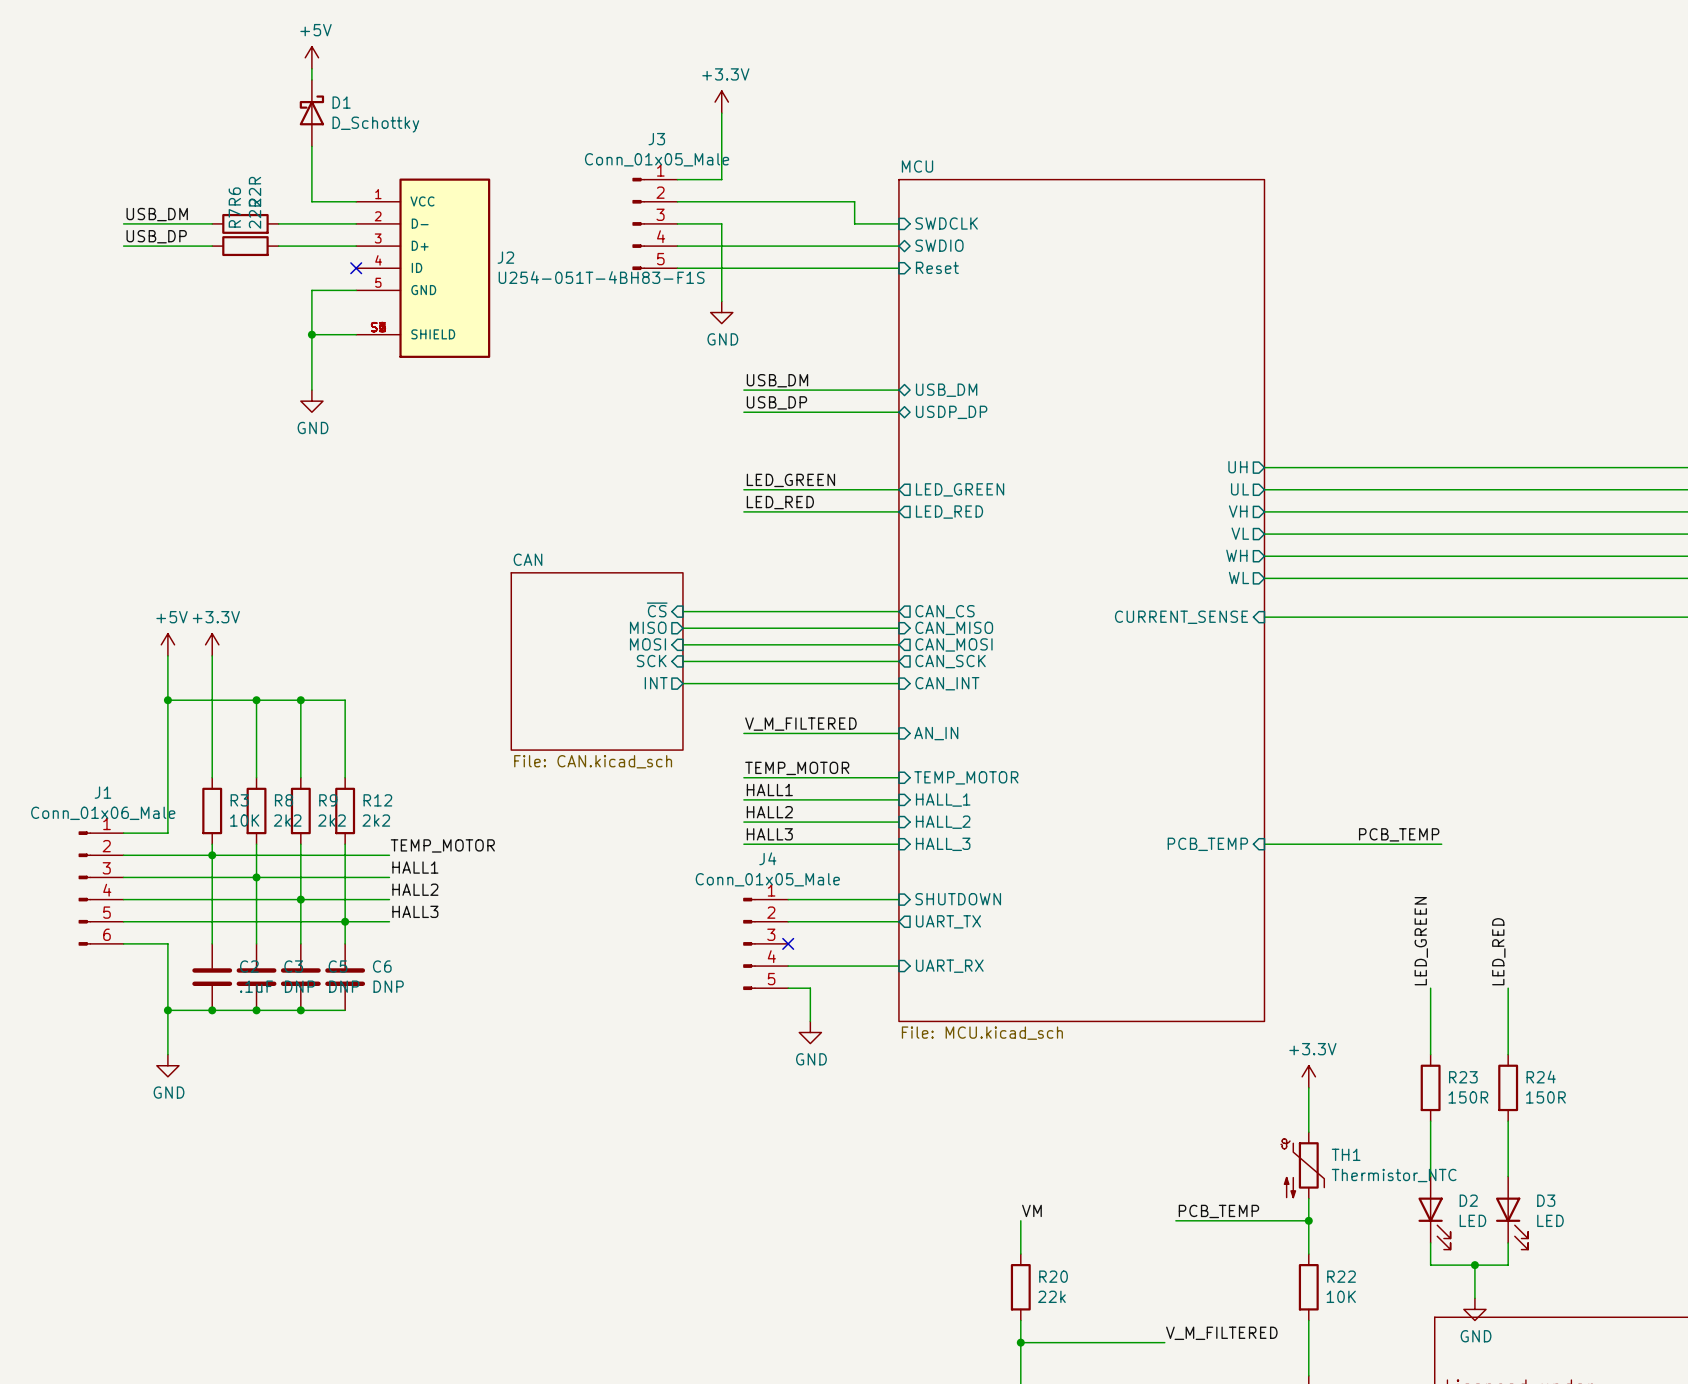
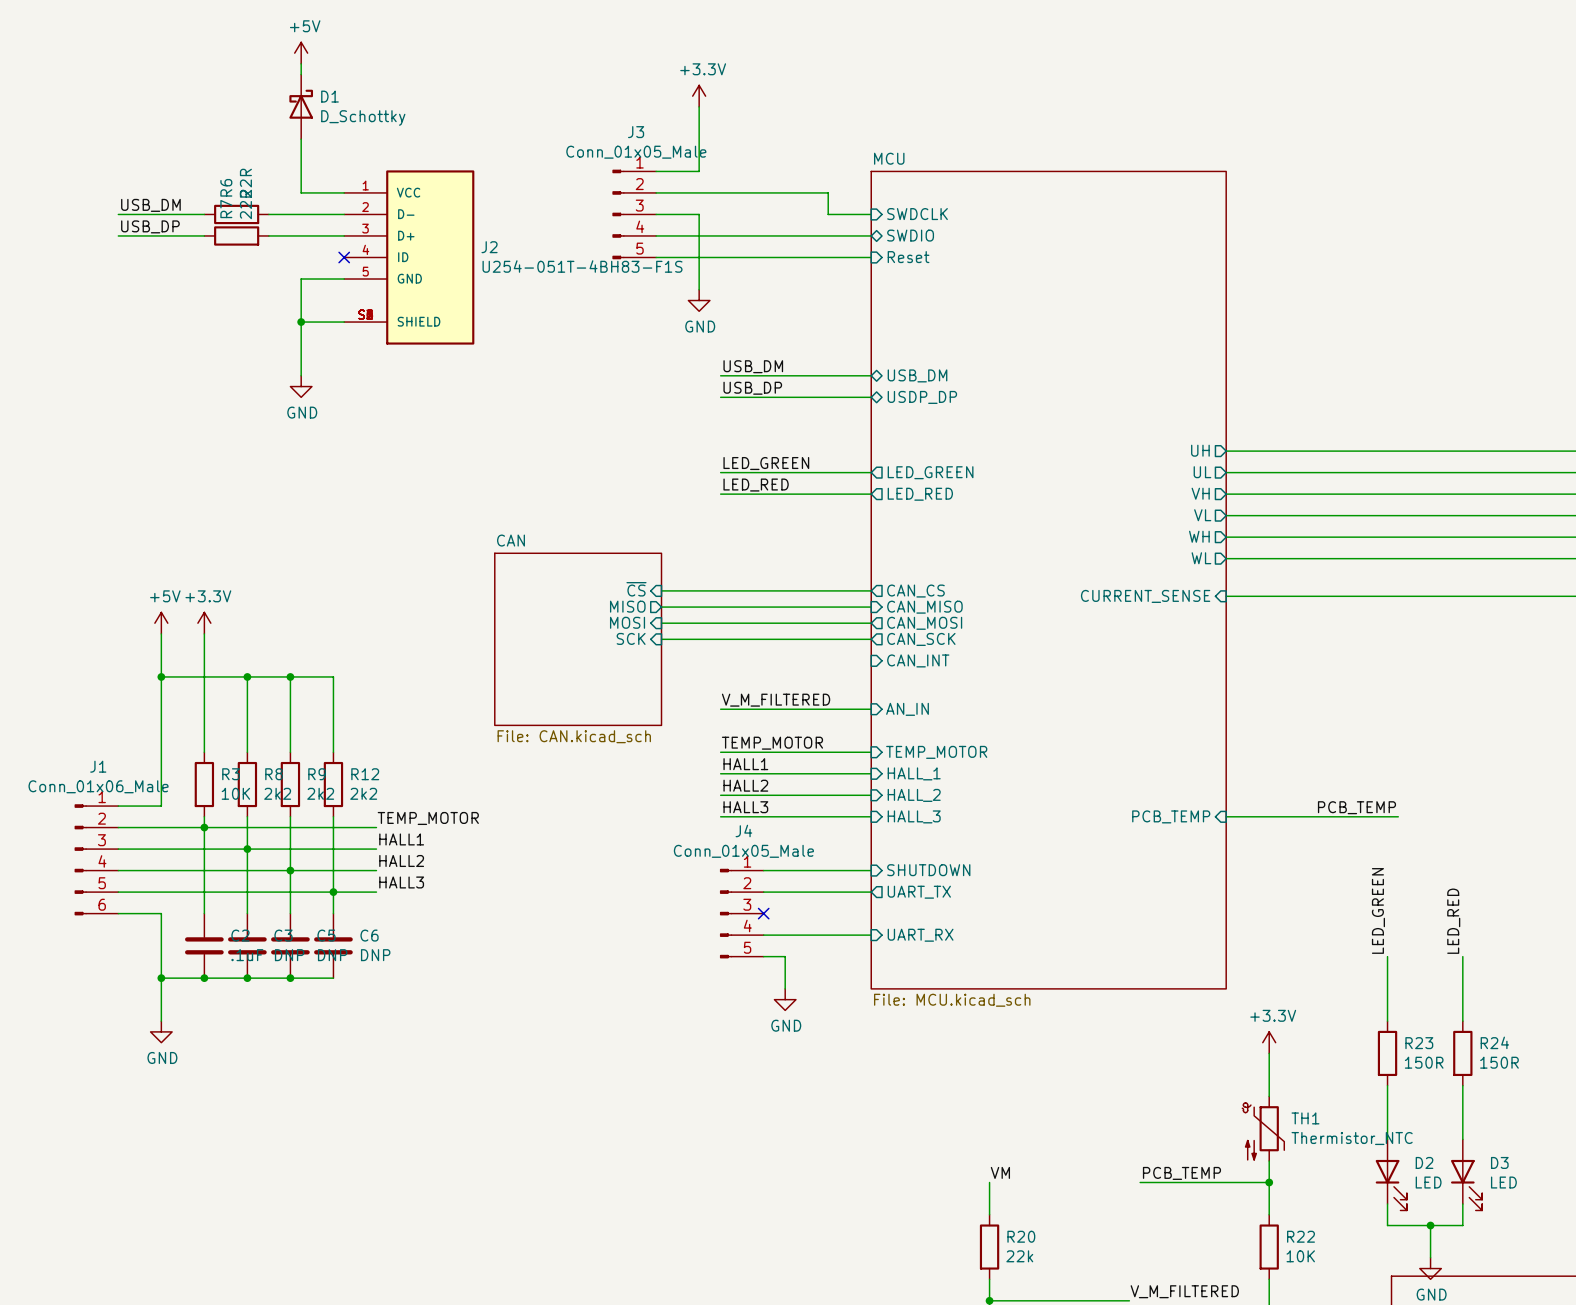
sheet pin: INT (656, 683) -> none
wire: (682, 683) (898, 683) -> none

